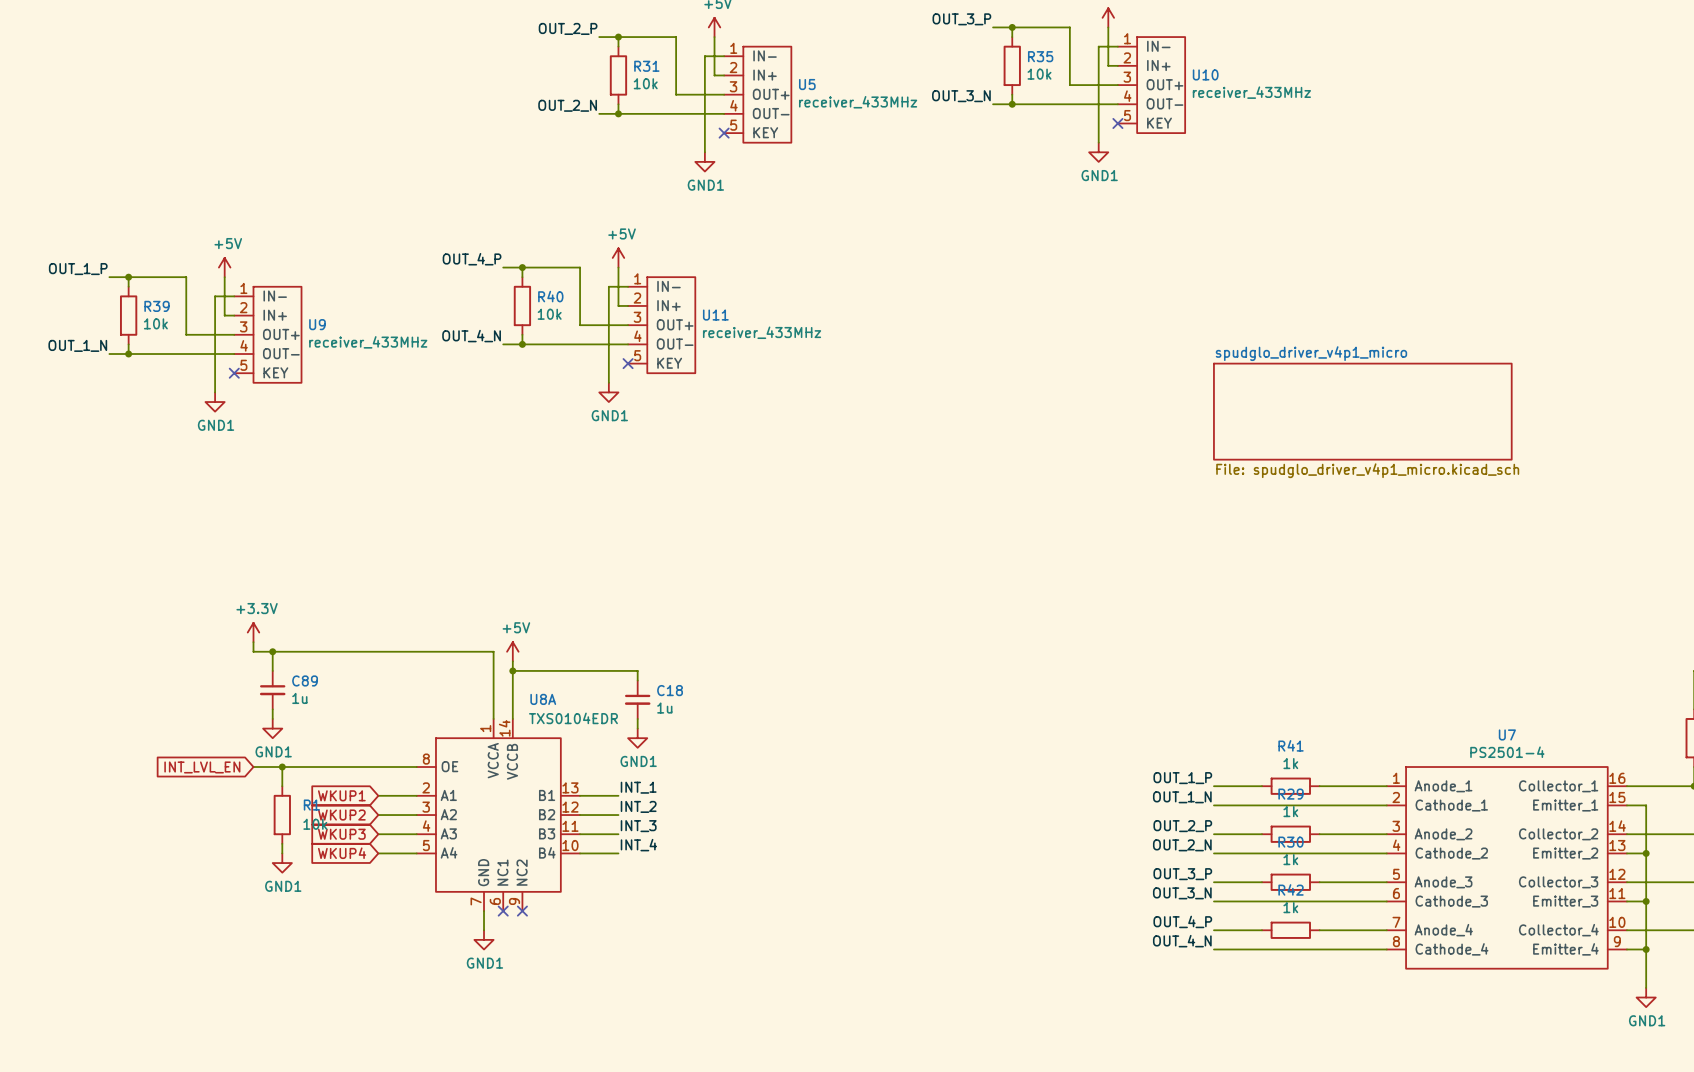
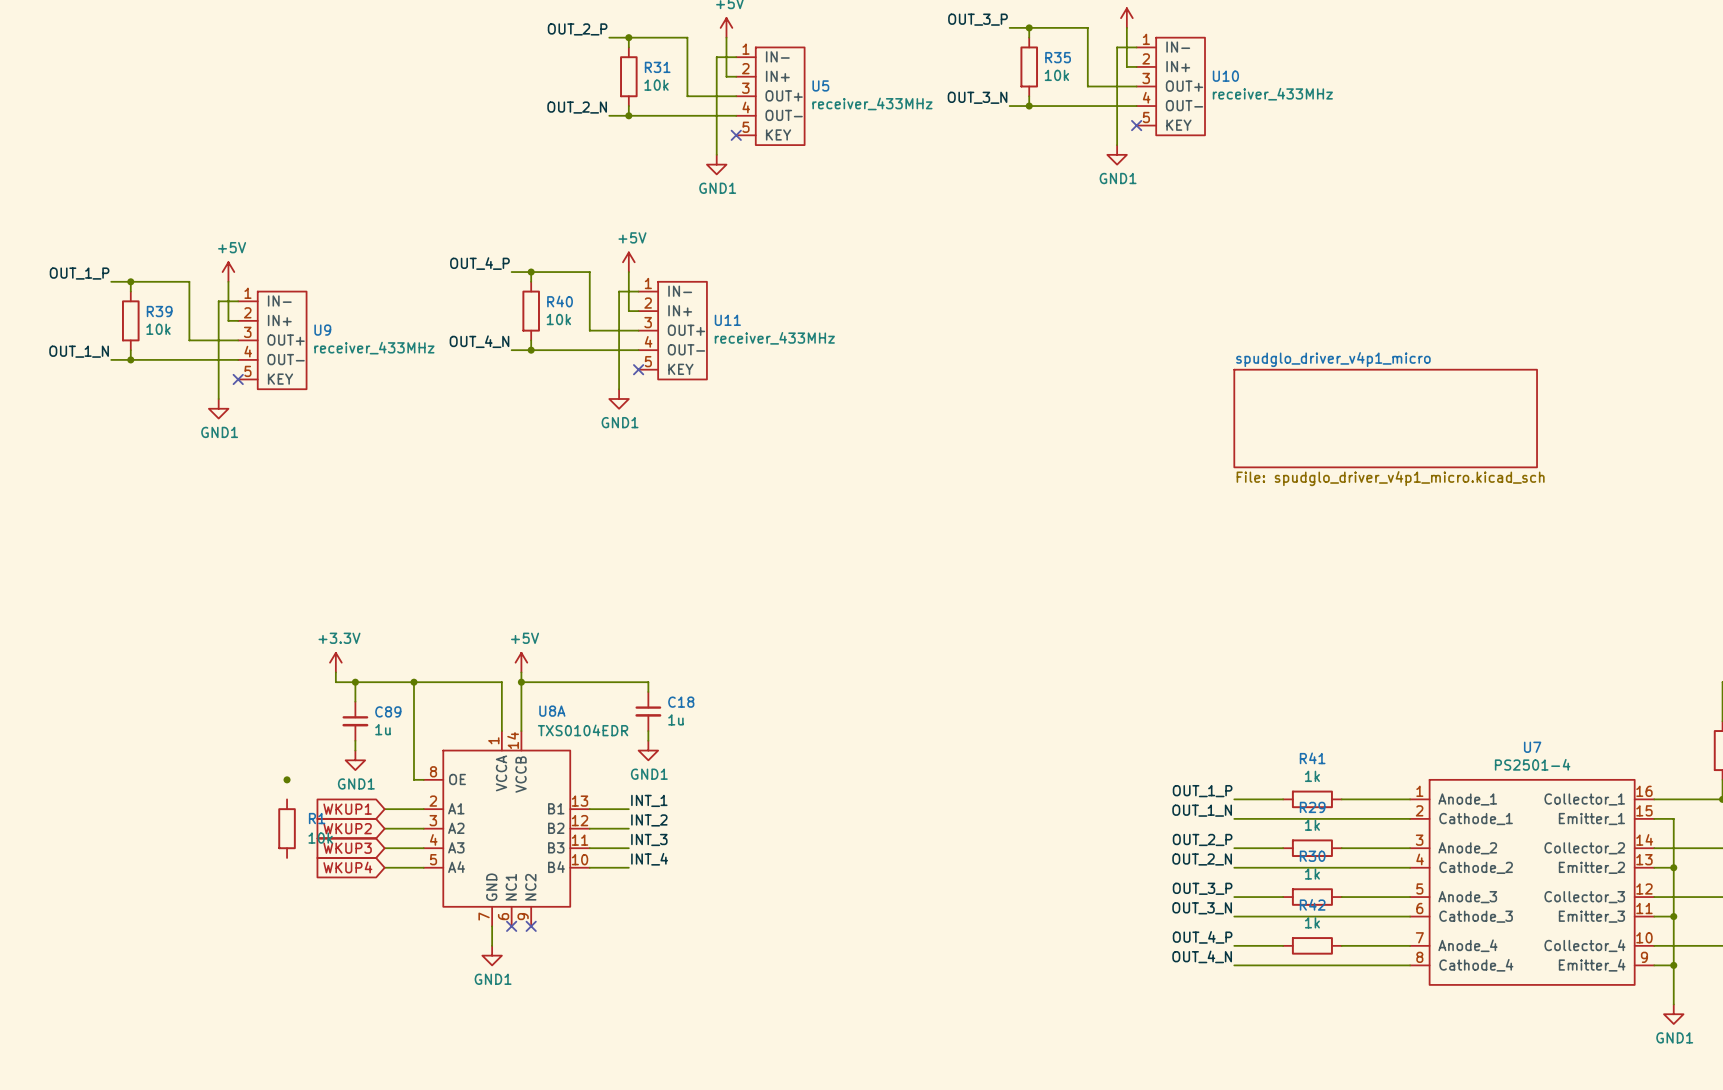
power symbol position: +3.3V (253, 632) -> +3.3V (335, 662)
wire: (253, 642) (253, 651) (493, 651) (493, 670) -> (335, 672) (335, 682) (501, 682)
wire: (272, 651) (272, 670) -> (355, 682) (355, 701)
junction: (272, 651) -> none
junction: none -> (355, 682)
junction: none -> (413, 682)
C89 position: (272, 690) -> (355, 721)
wire: (272, 709) (272, 718) -> (355, 740) (355, 750)
power symbol: GND1 (272, 728) -> none
power symbol: none -> GND1 (355, 760)
global label: INT_LVL_EN (202, 767) -> none
wire: (253, 767) (407, 767) -> (413, 682) (413, 779)
wire: (282, 767) (282, 786) -> none
wire: (282, 843) (282, 853) -> none
power symbol: GND1 (282, 863) -> none

